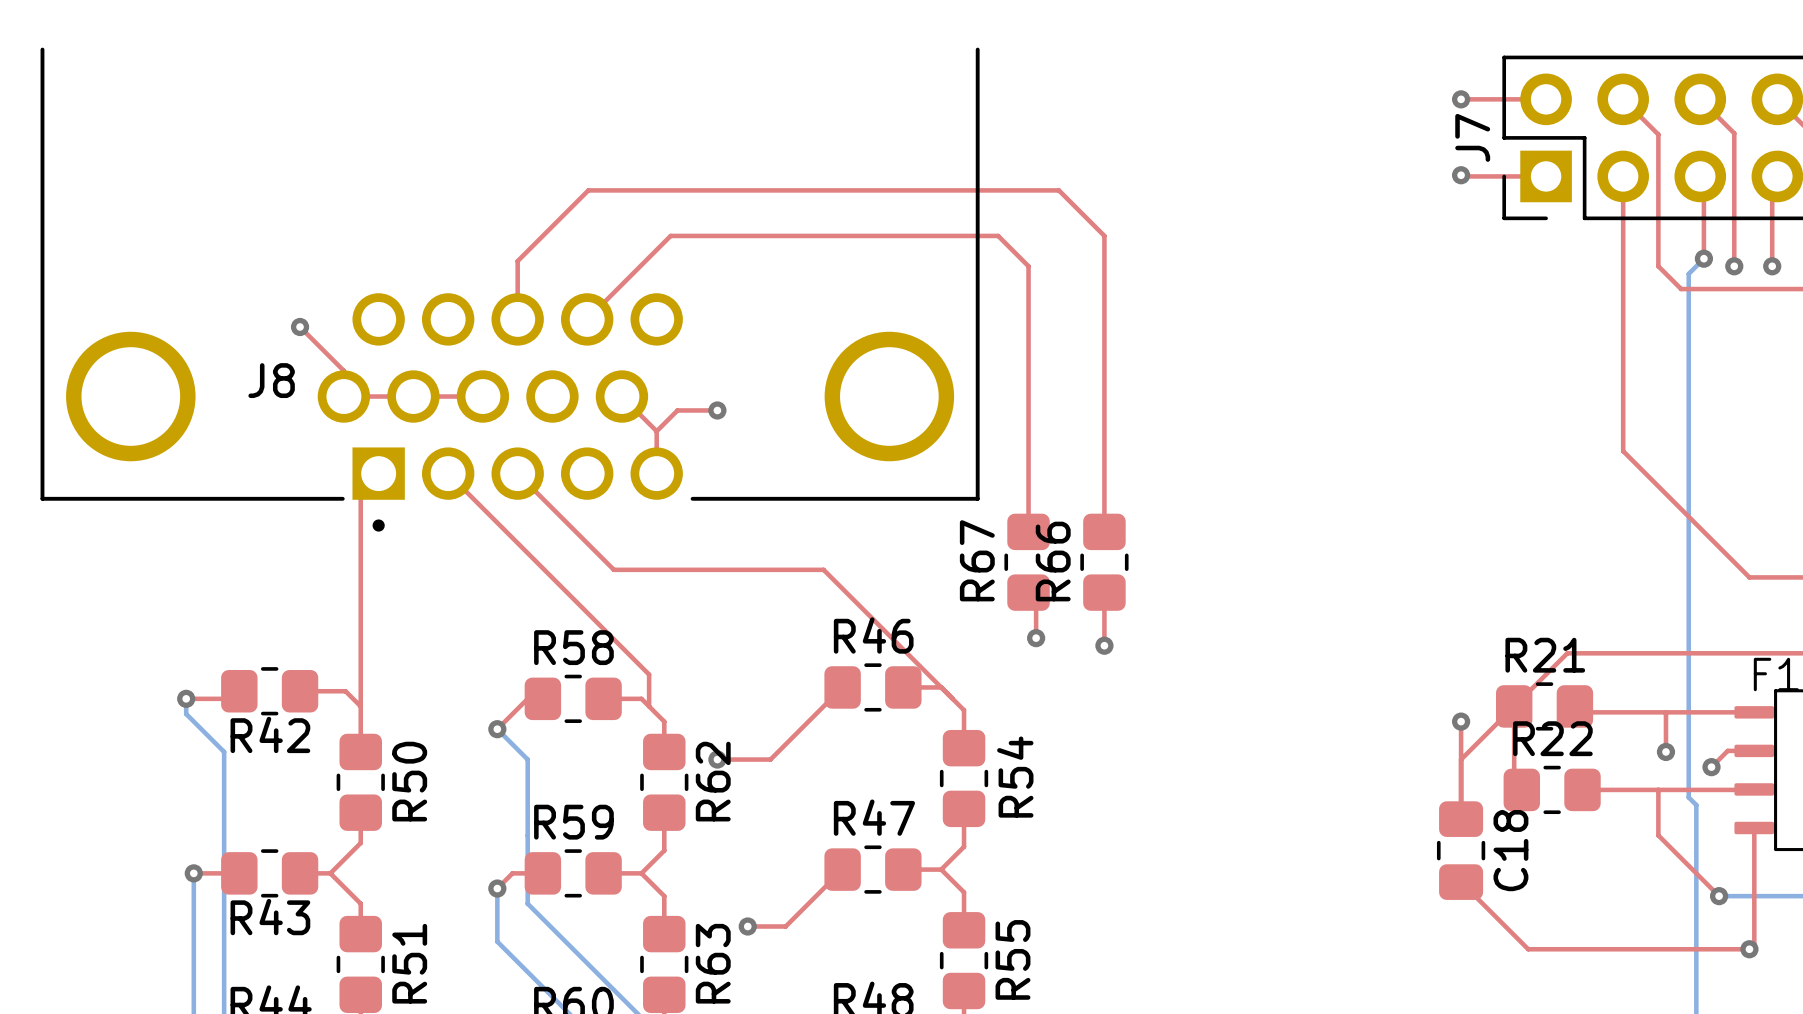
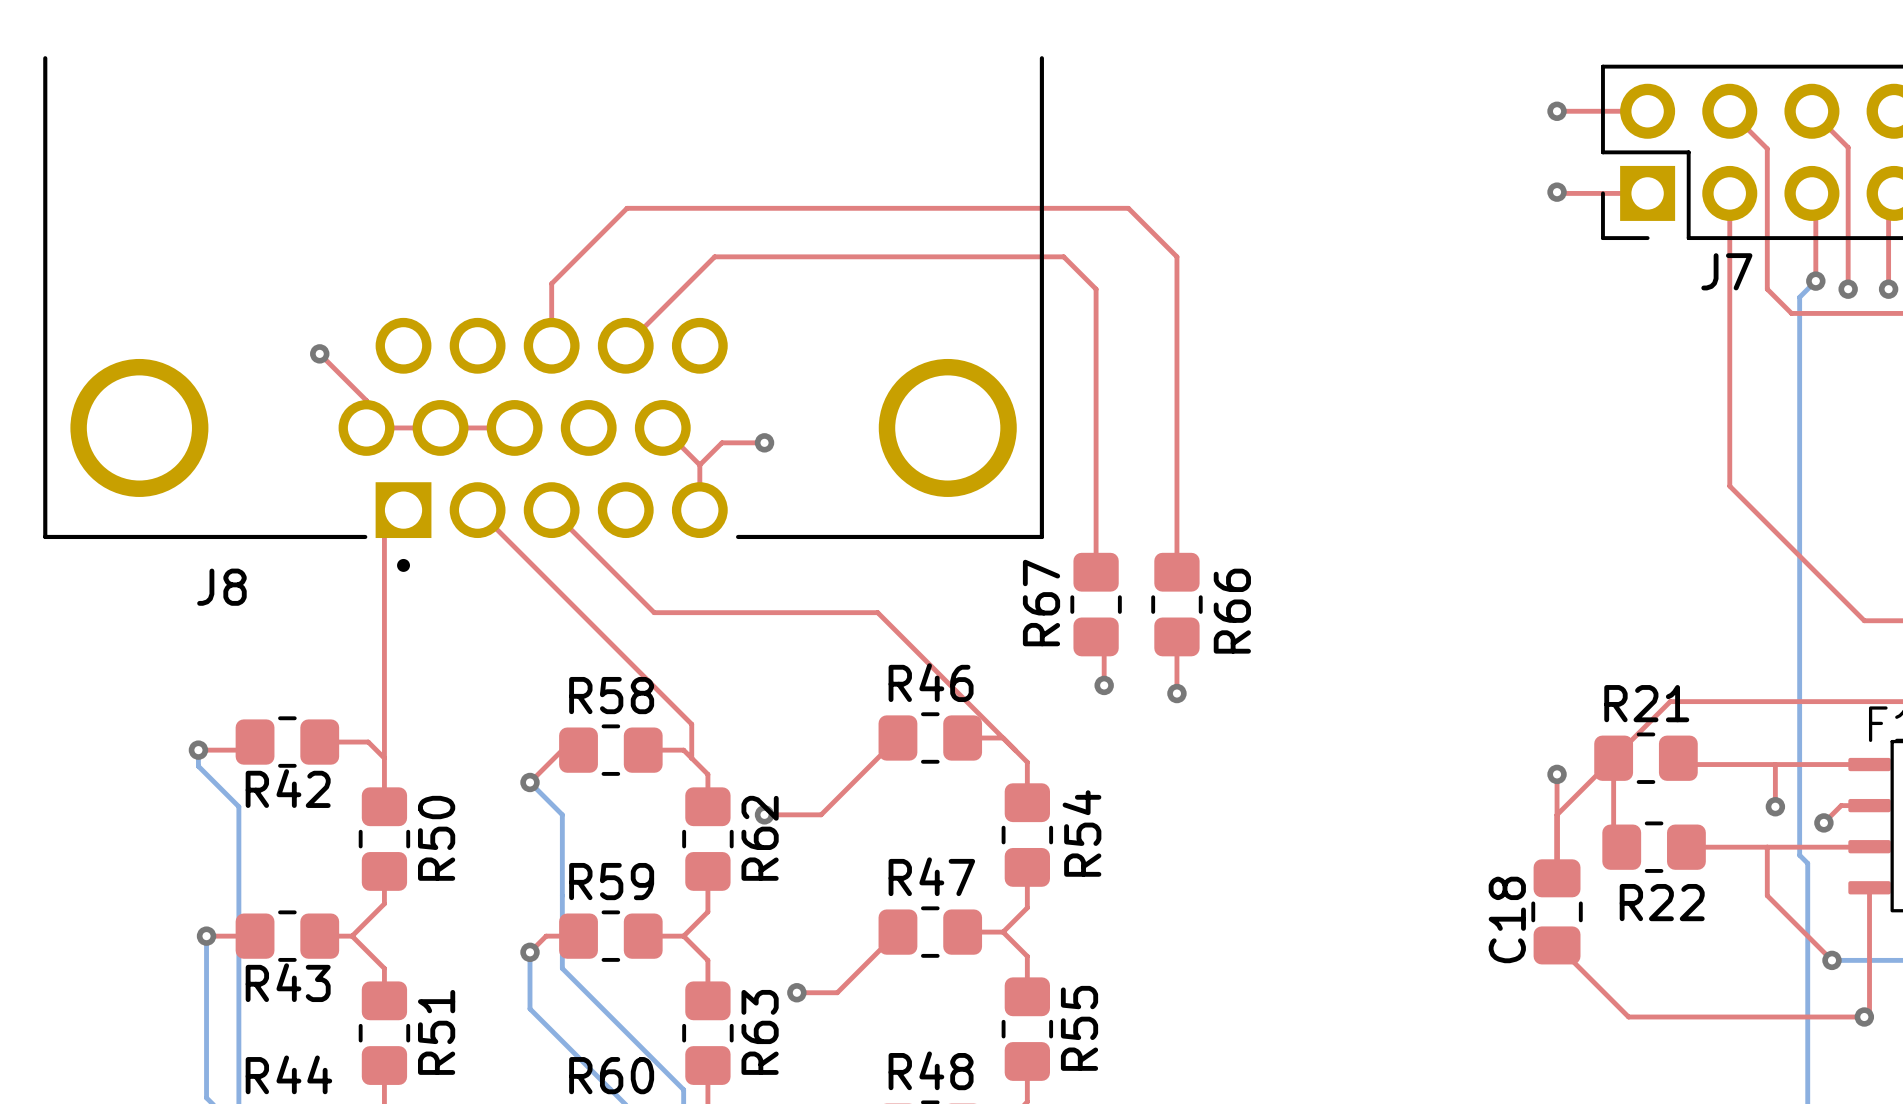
J7 name rotation: 0° (1472, 137) -> 90° clockwise (1726, 271)
J7 name position: J7 (1472, 137) -> J7 (1726, 271)
J8 name position: J8 (271, 380) -> J8 (221, 587)
R66 name position: R66 (1053, 561) -> R66 (1232, 611)
R22 name position: R22 (1552, 738) -> R22 (1662, 902)
C18 name position: C18 (1510, 850) -> C18 (1507, 919)

